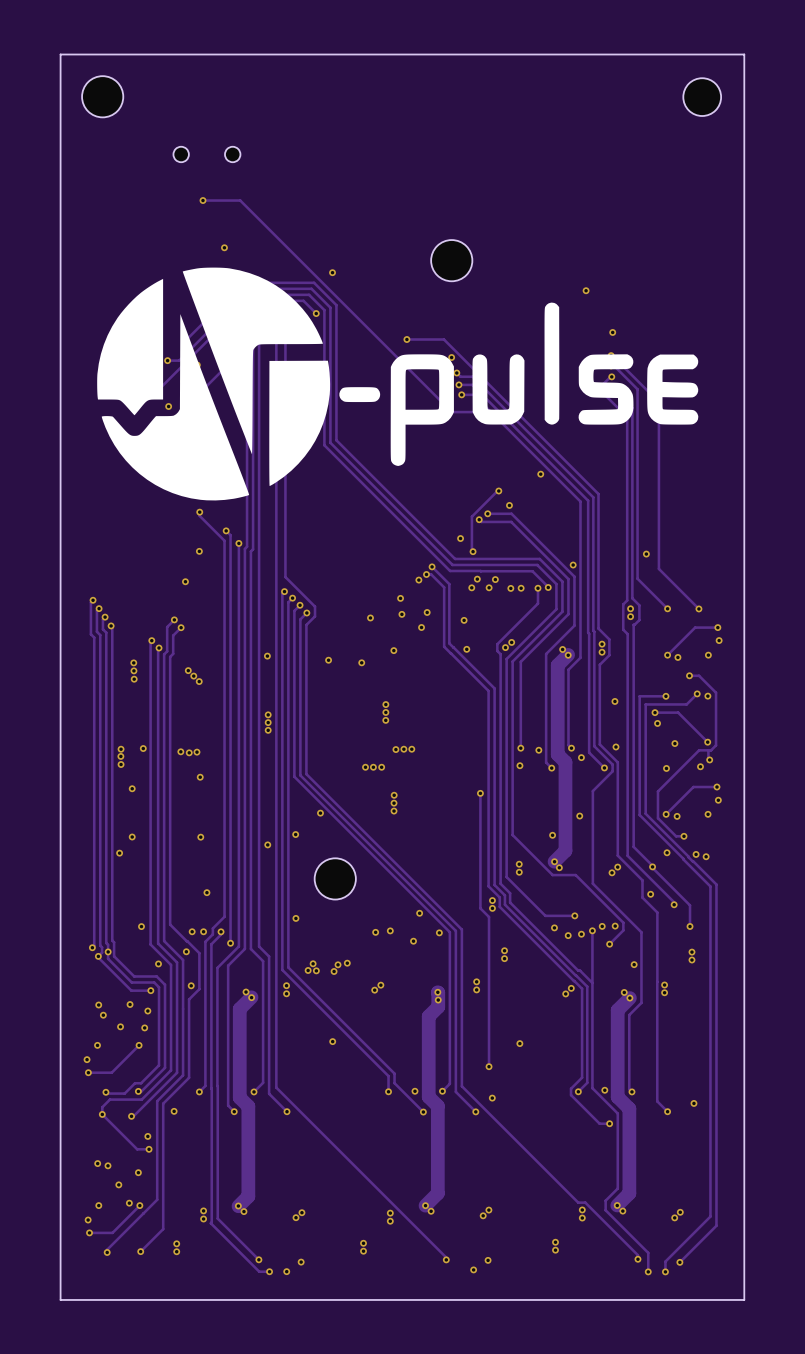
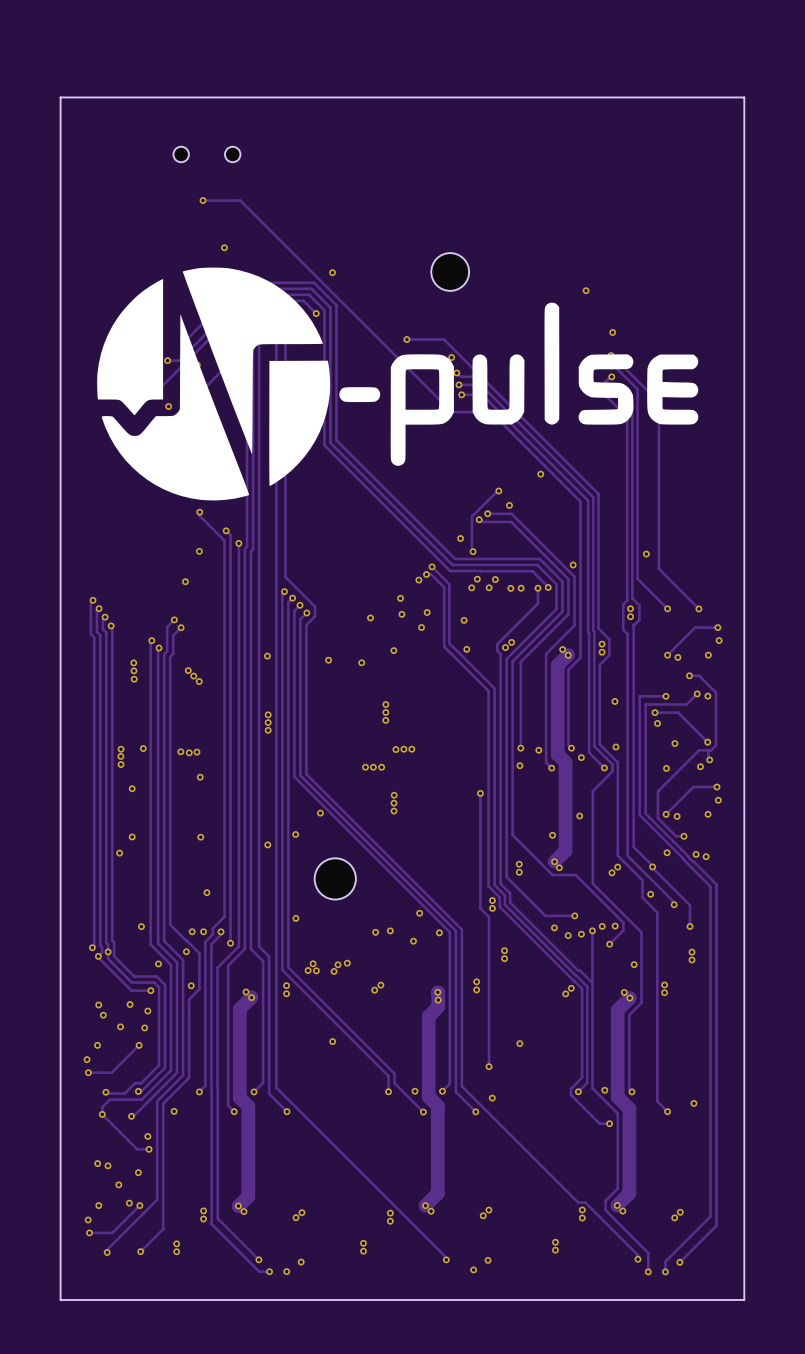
part: (102, 96) -> none
part: (702, 97) -> none
board edge: (744, 97) (744, 54) (60, 54) (60, 97) -> (744, 97) (60, 97)
part footprint: [431, 240, 473, 282] -> [431, 253, 470, 291]

